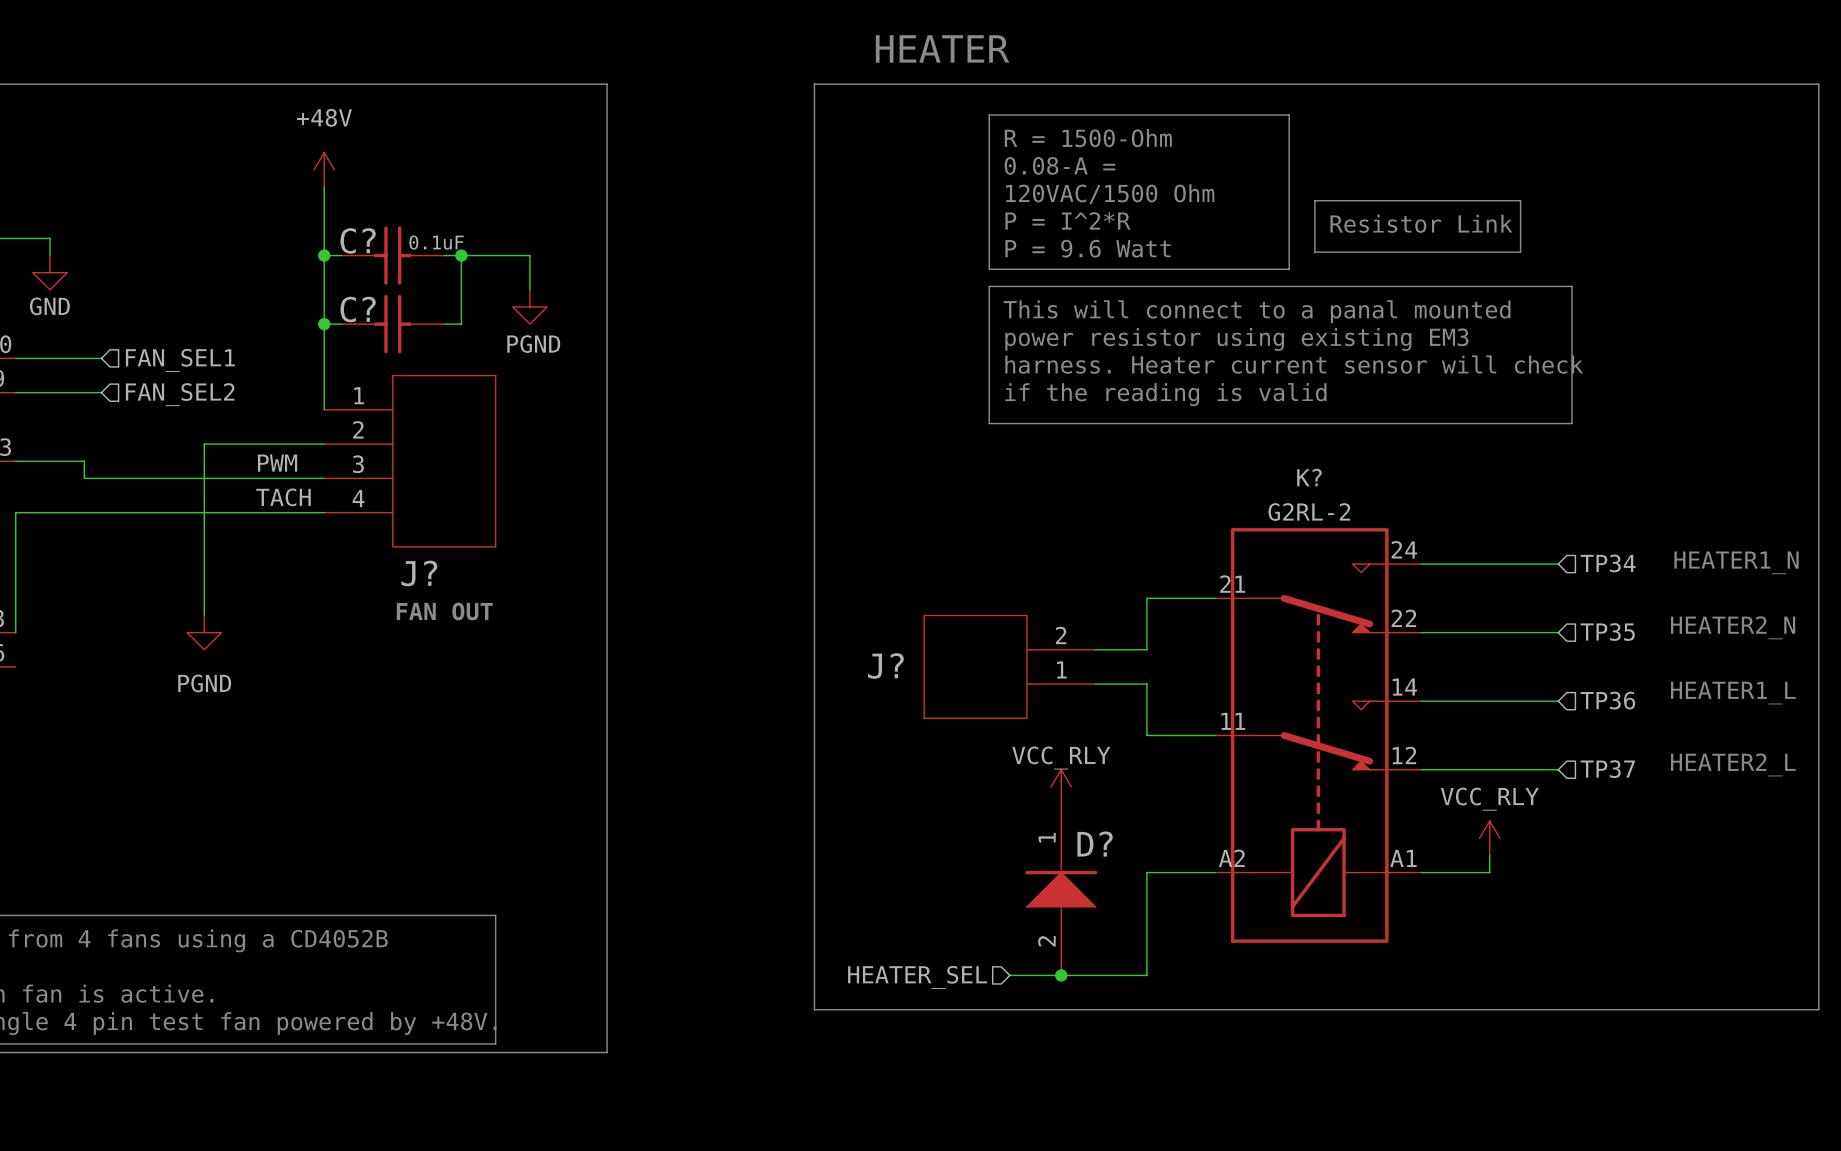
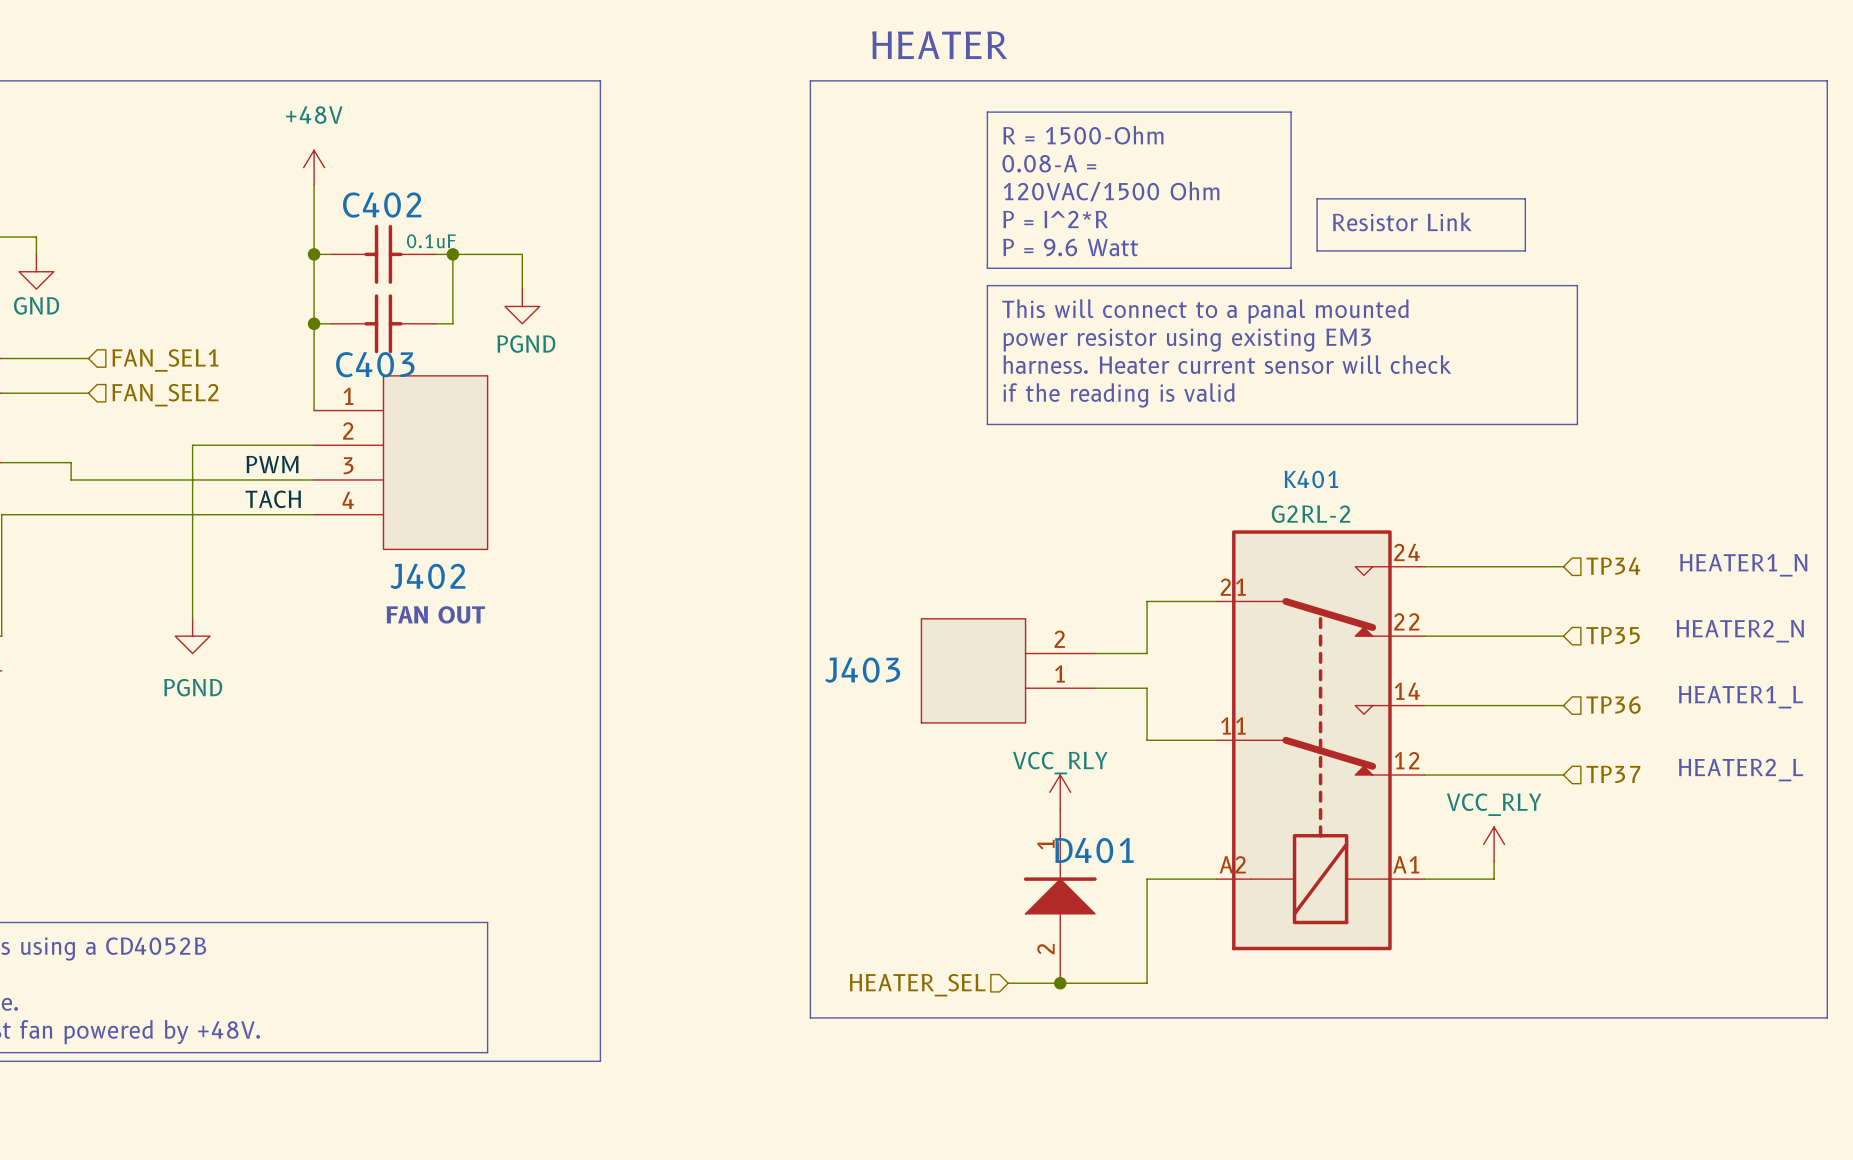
C? name: C? (358, 240) -> C402 (382, 205)
C? name: C? (358, 309) -> C403 (375, 364)
K? name: K? (1309, 477) -> K401 (1311, 479)
J? name: J? (419, 573) -> J402 (427, 576)
J? name: J? (885, 666) -> J403 (862, 670)
D? name: D? (1095, 844) -> D401 (1094, 850)

